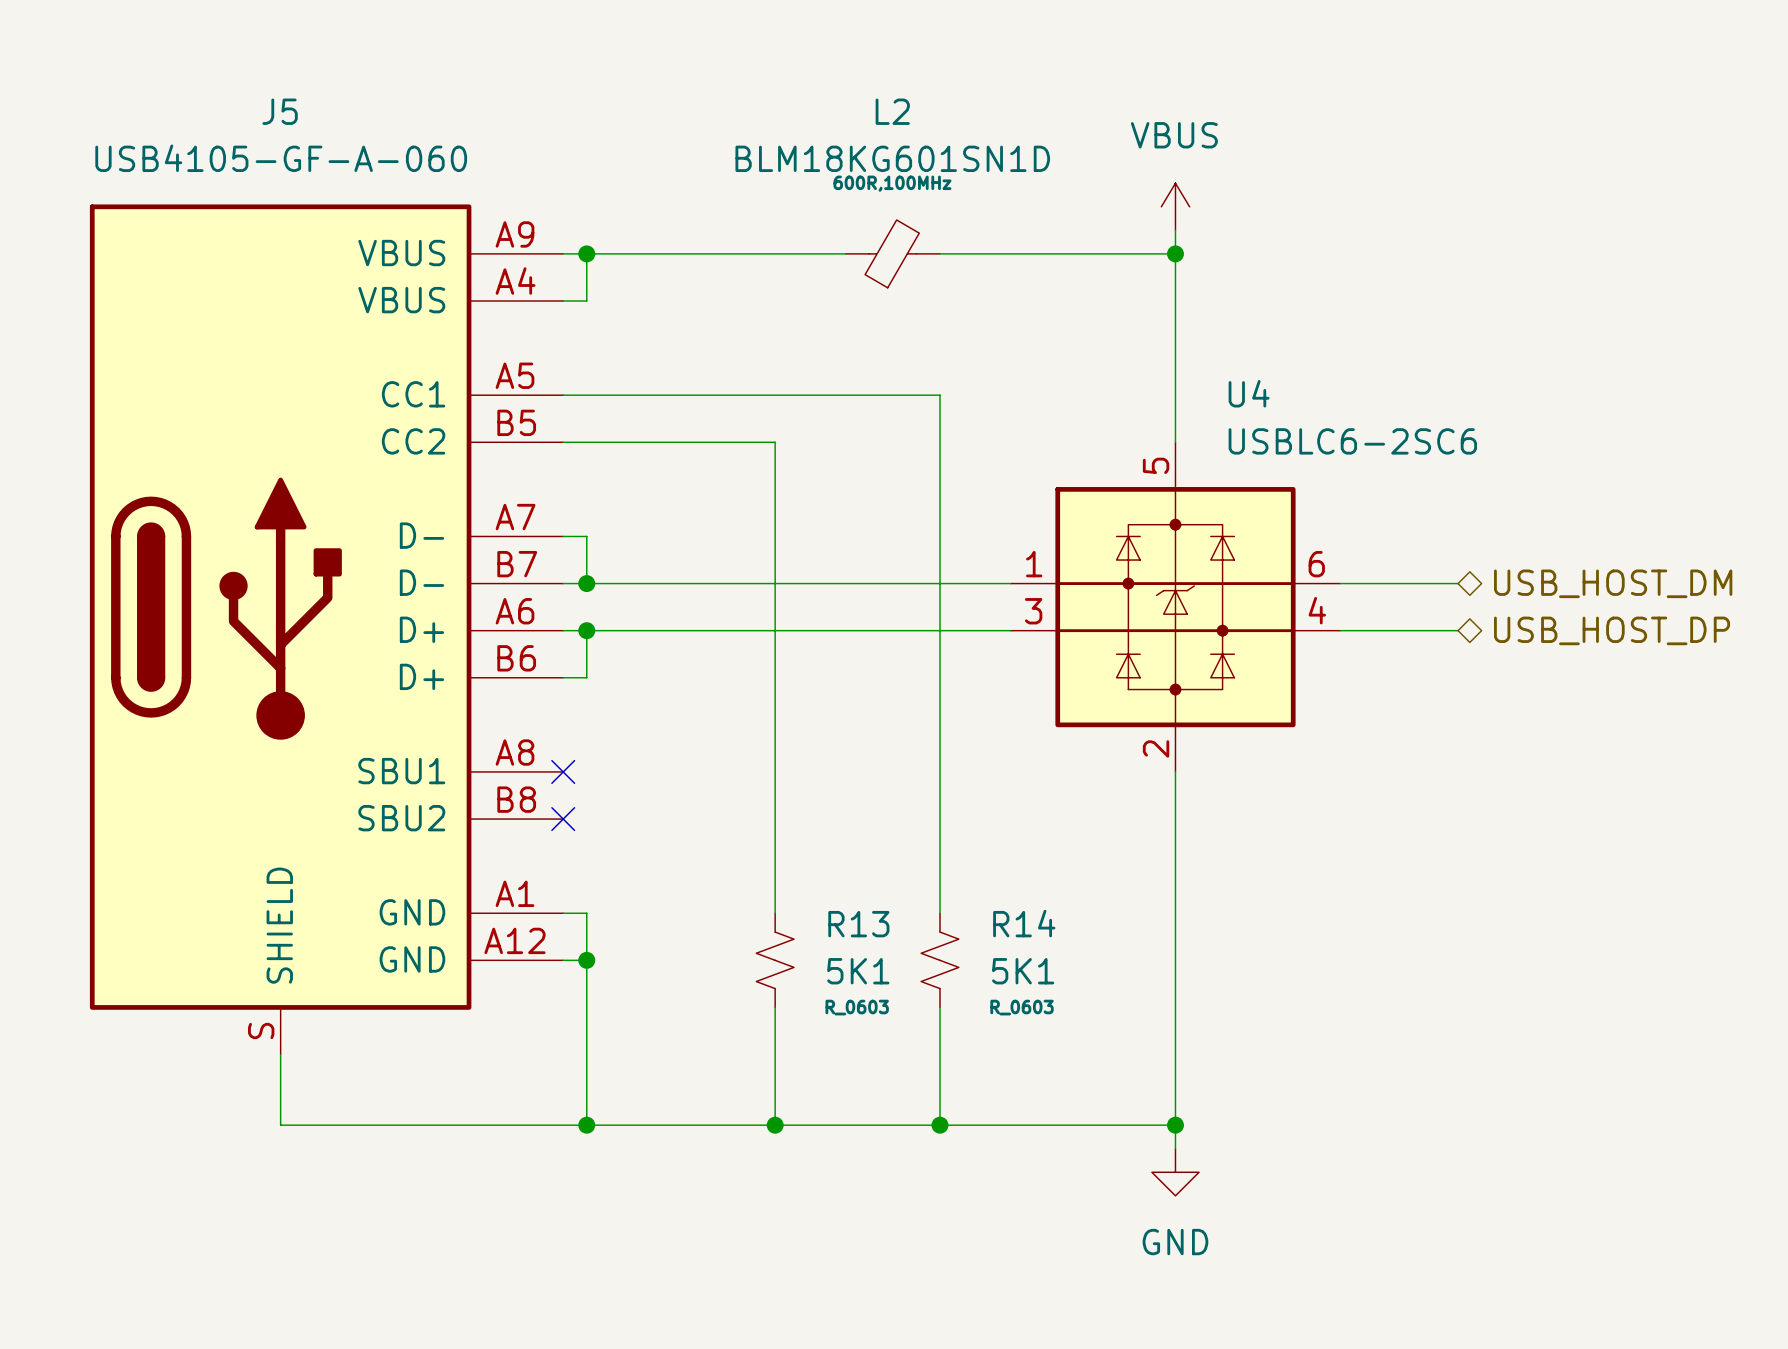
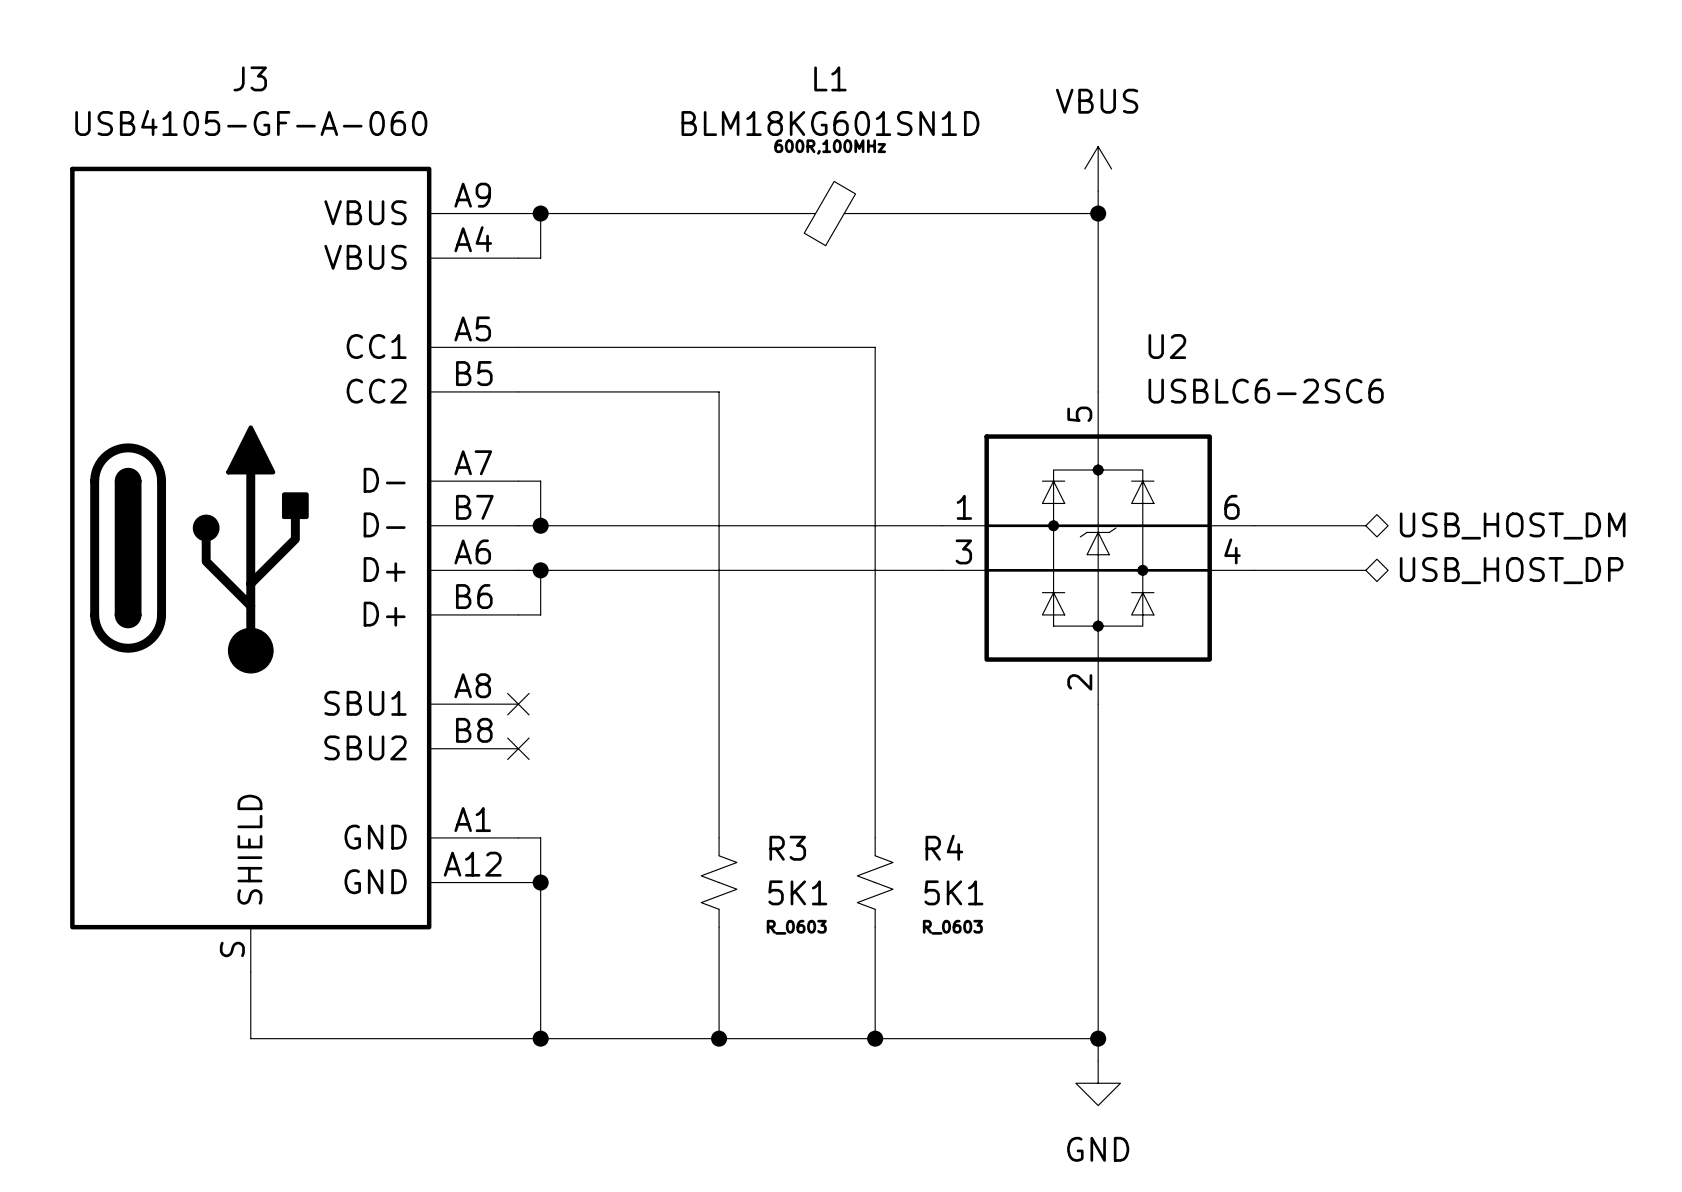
J5 name: J5 (280, 111) -> J3 (250, 78)
L2 name: L2 (892, 111) -> L1 (830, 78)
U4 name: U4 (1249, 393) -> U2 (1167, 346)
R14 name: R14 (1024, 923) -> R4 (944, 847)
R13 name: R13 (858, 924) -> R3 (787, 848)

